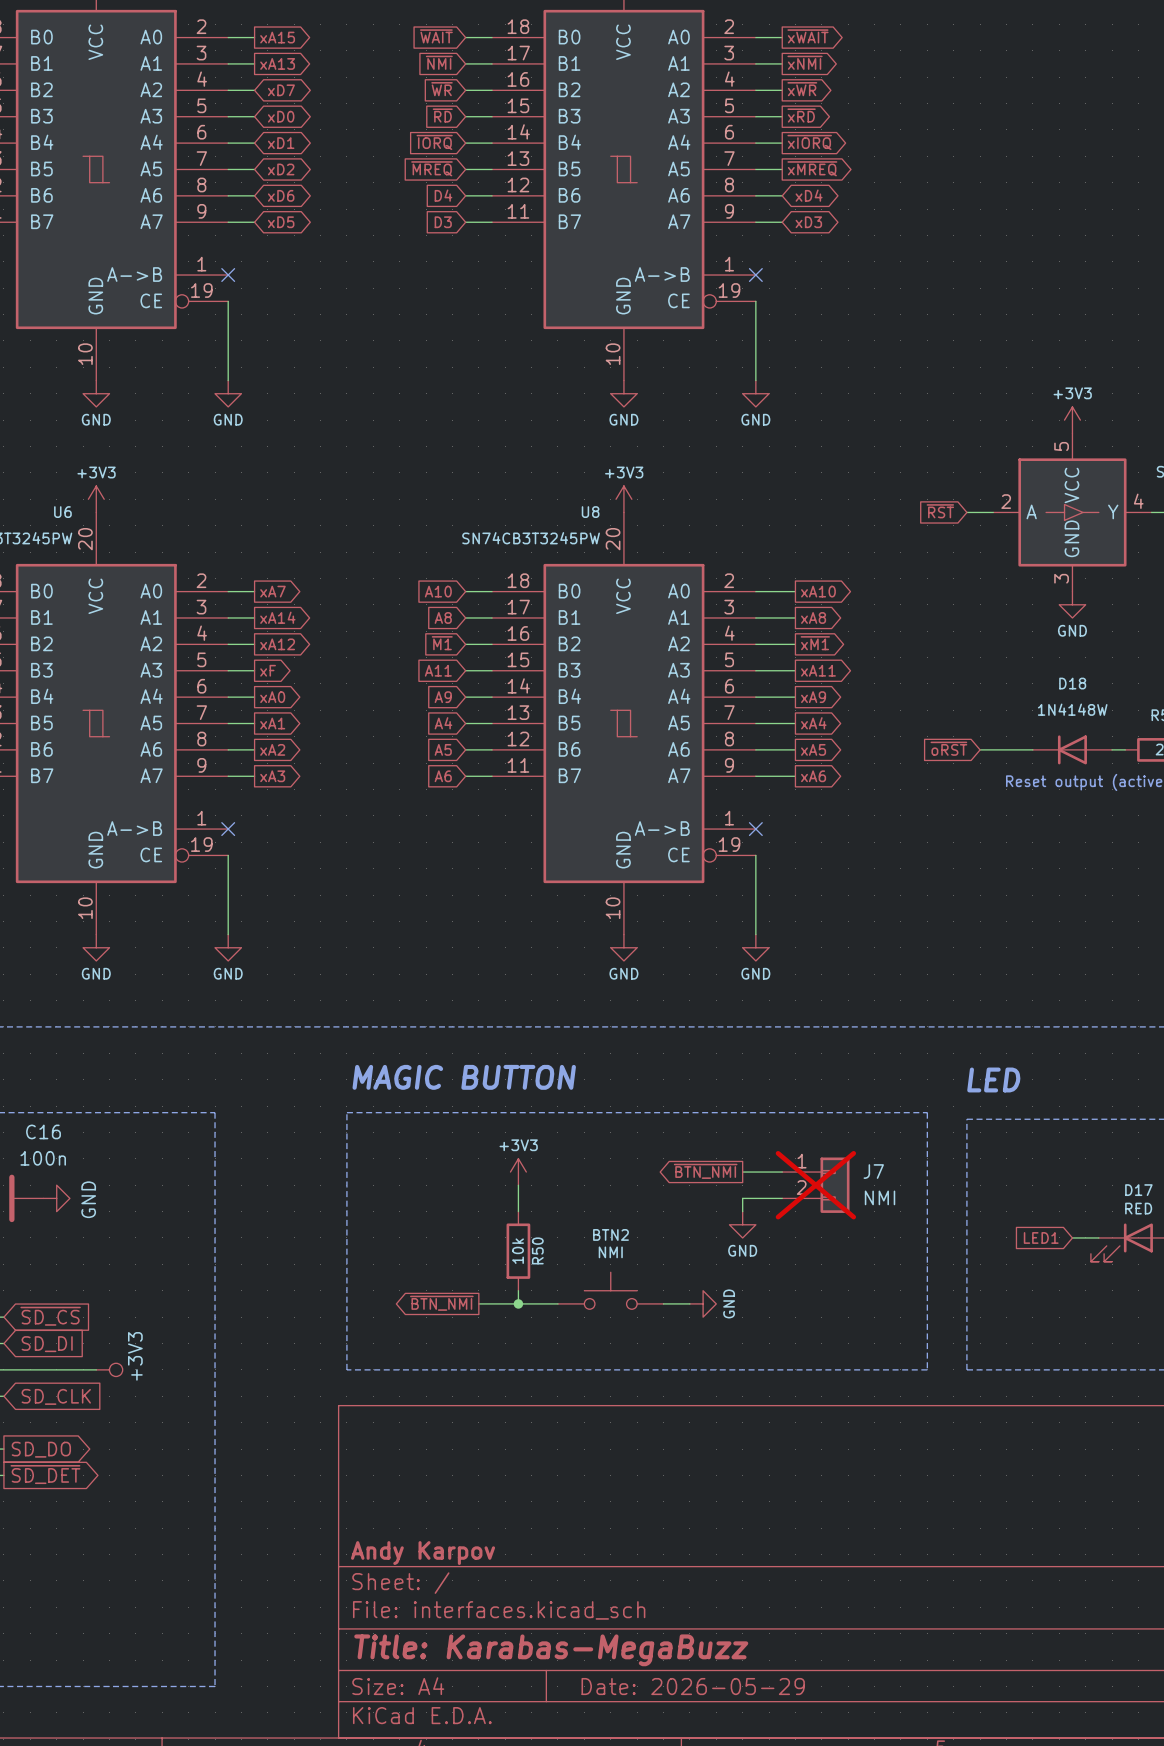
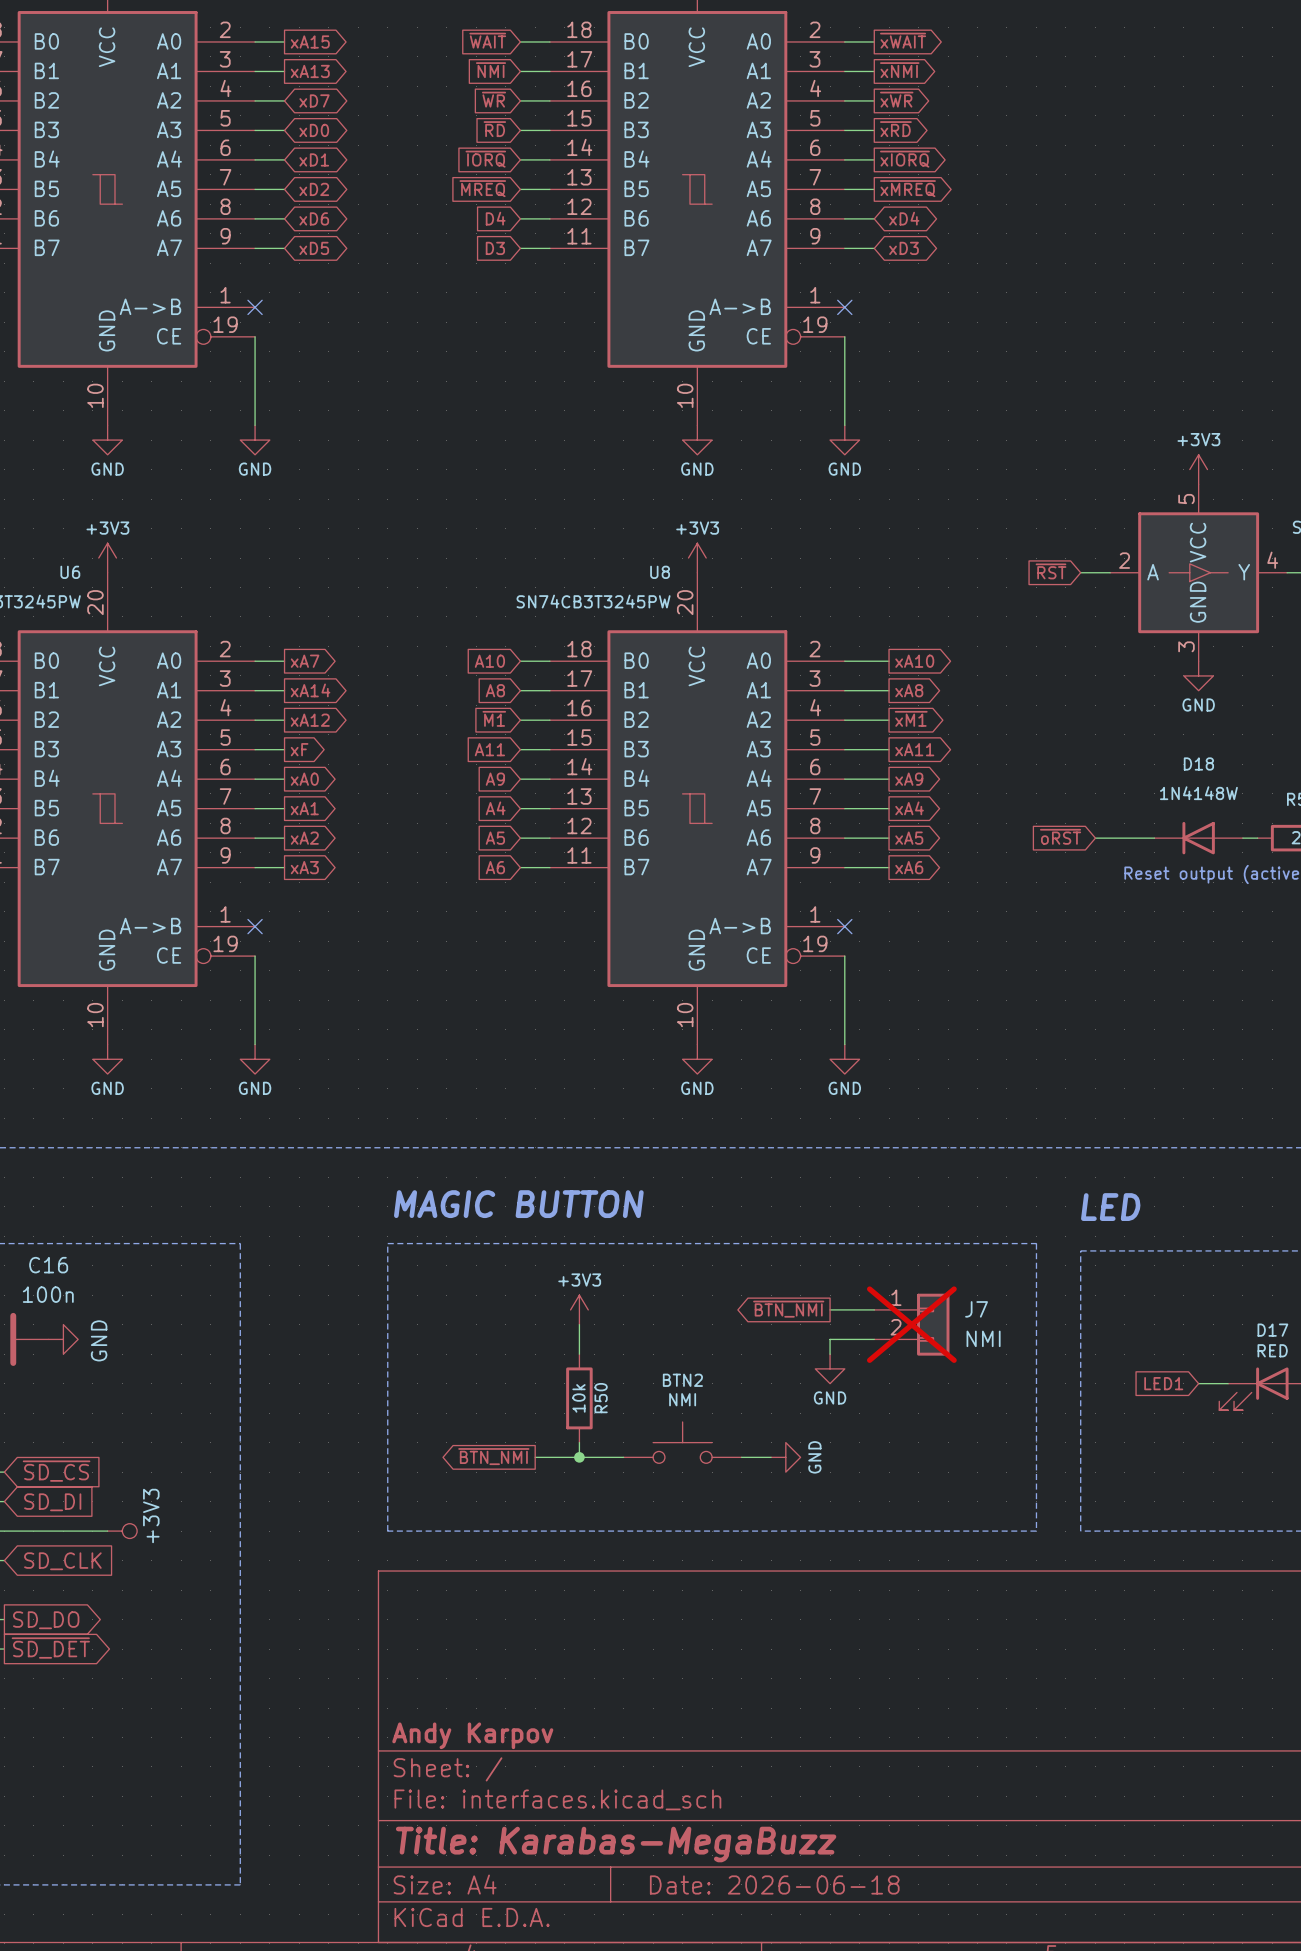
title block: Date: 2026-05-29 (693, 1686) -> Date: 2026-06-18 (774, 1884)

